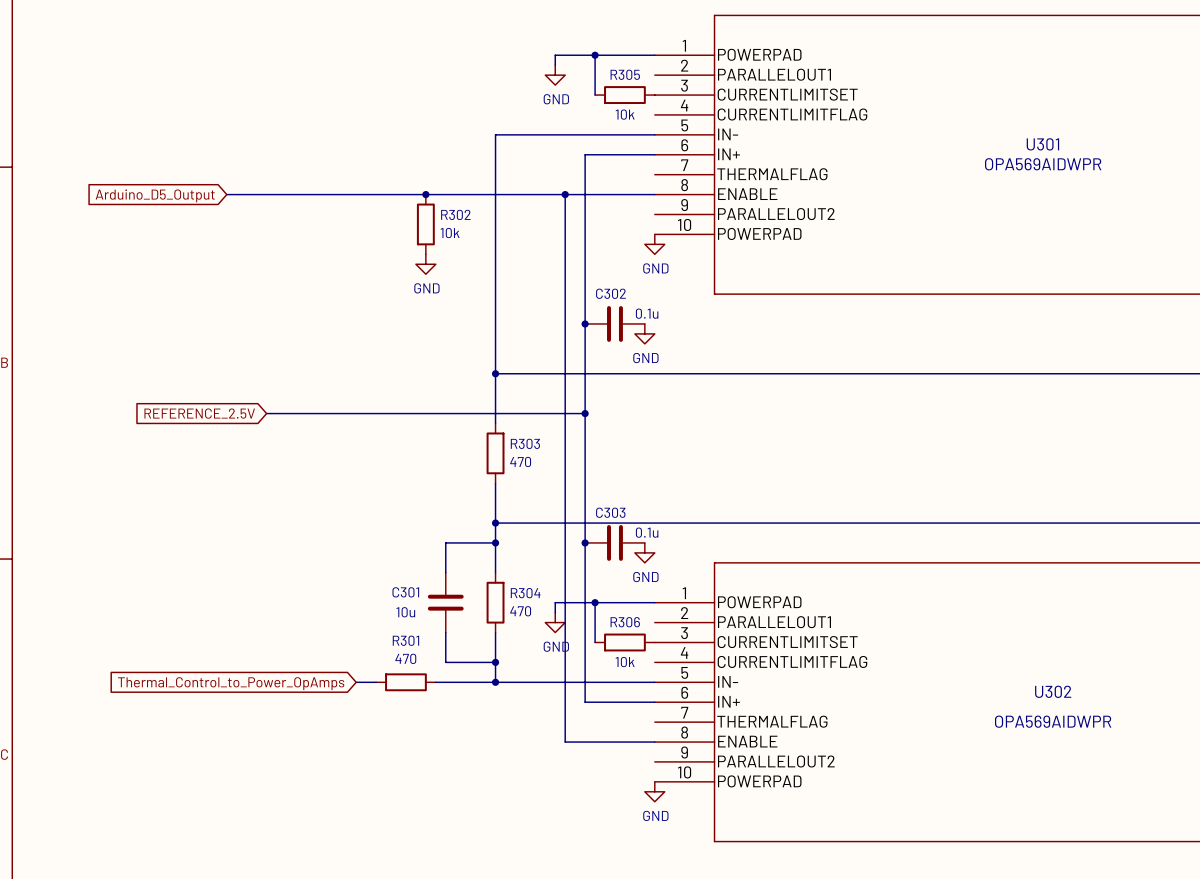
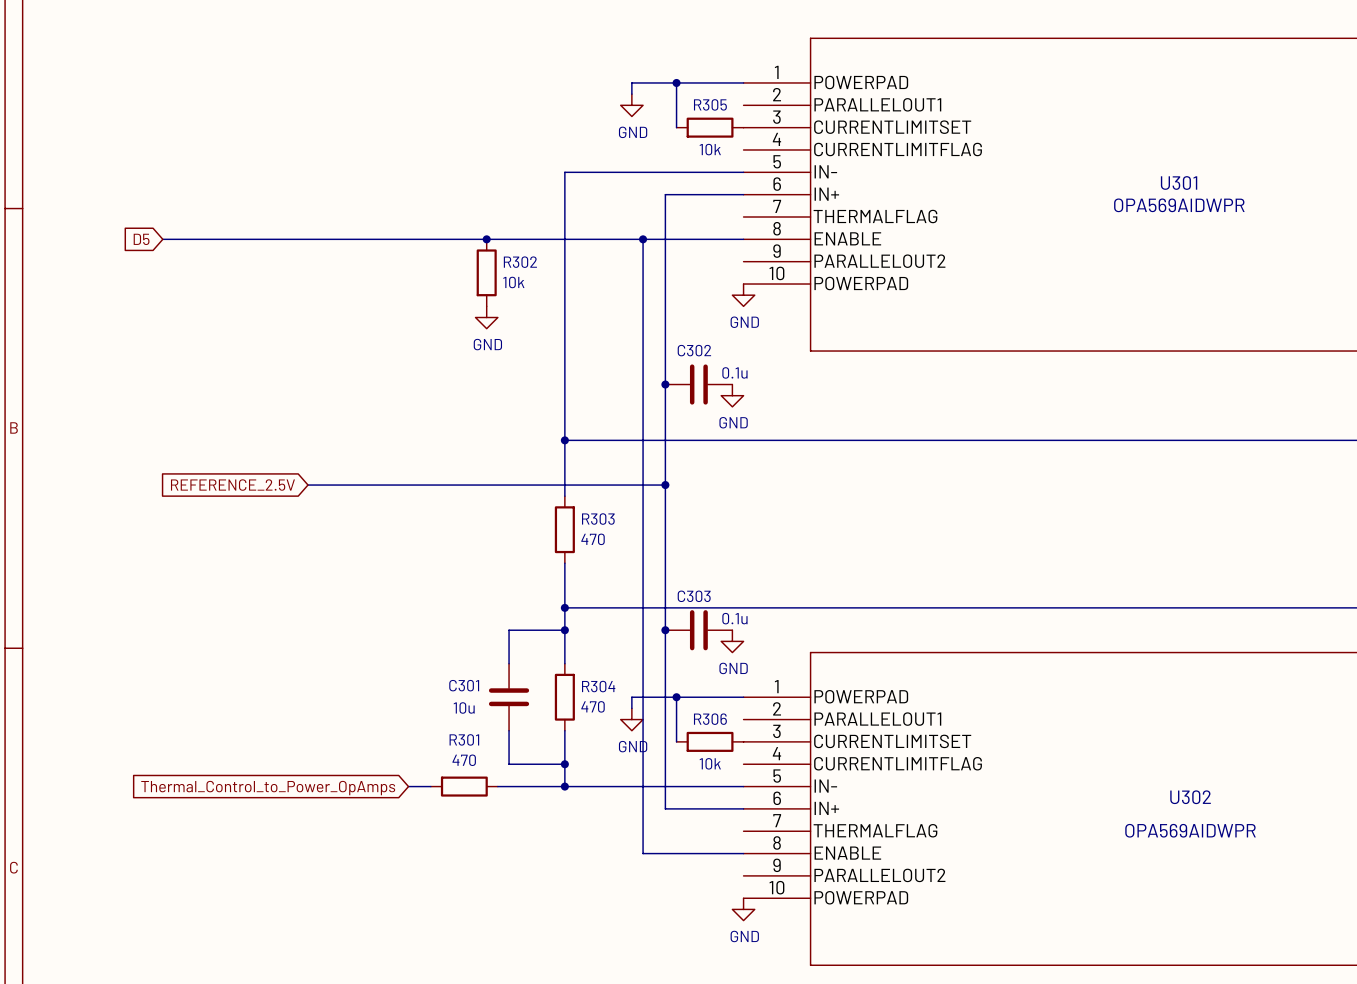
global label: none -> D5 (141, 239)
wire: none -> (162, 239) (263, 239)
global label: Arduino_D5_Output (155, 195) -> none

